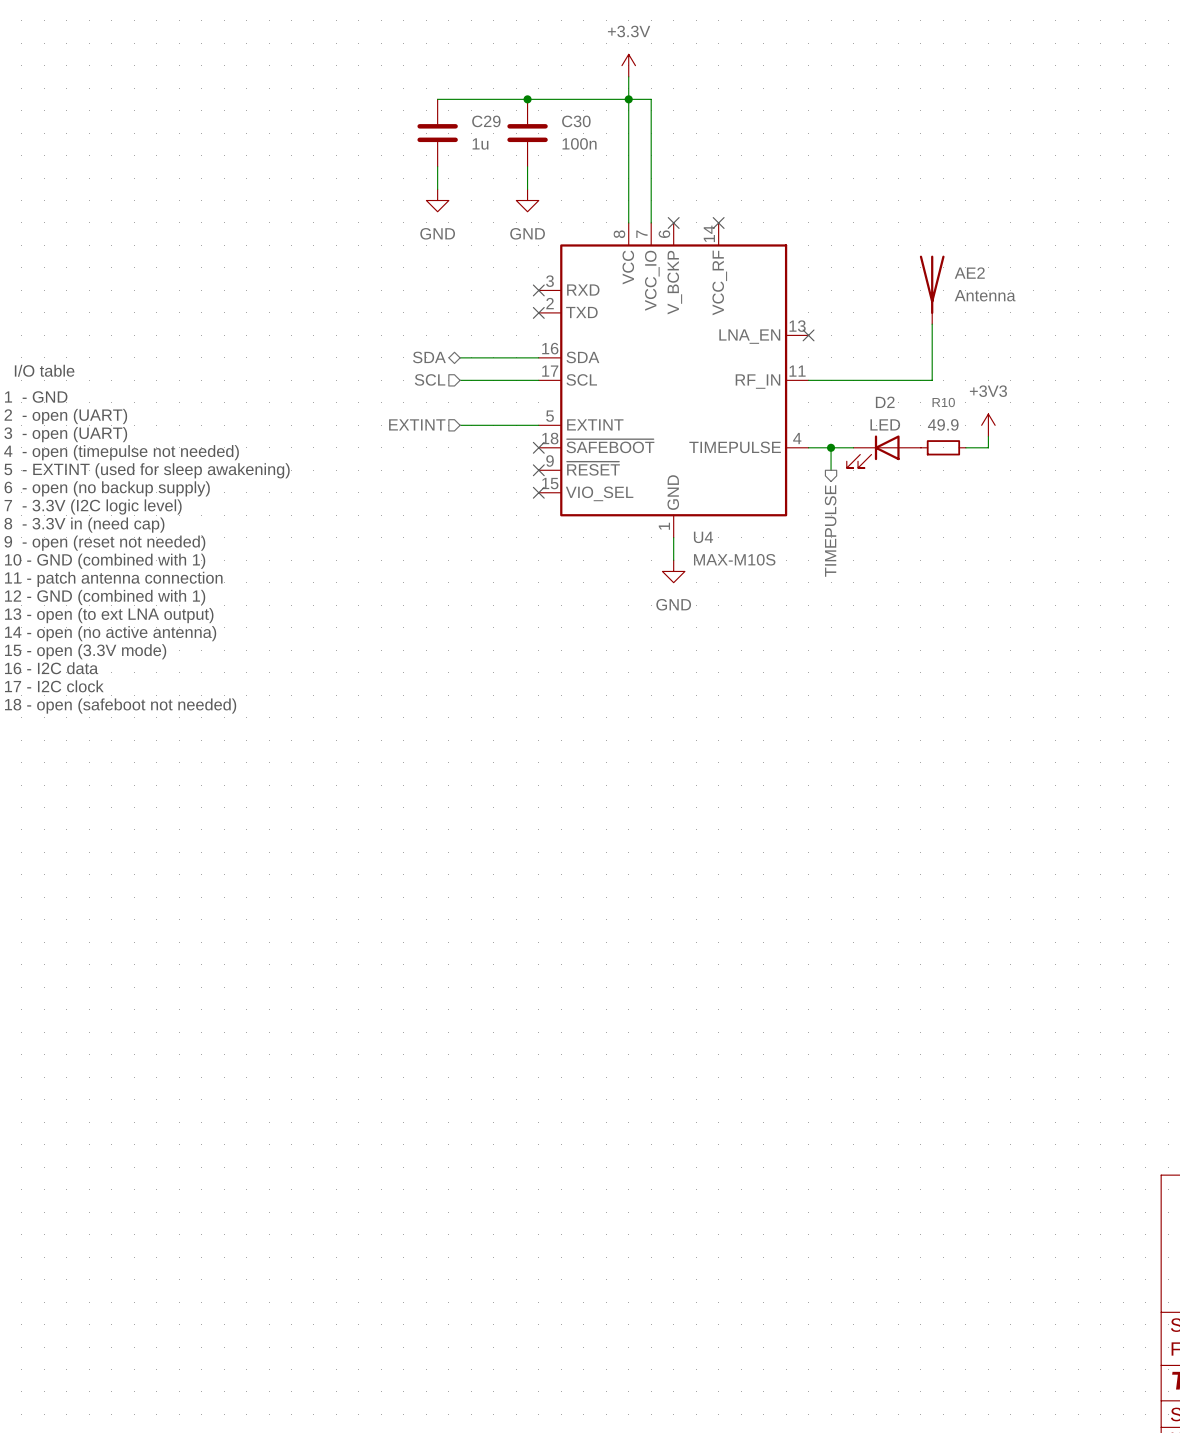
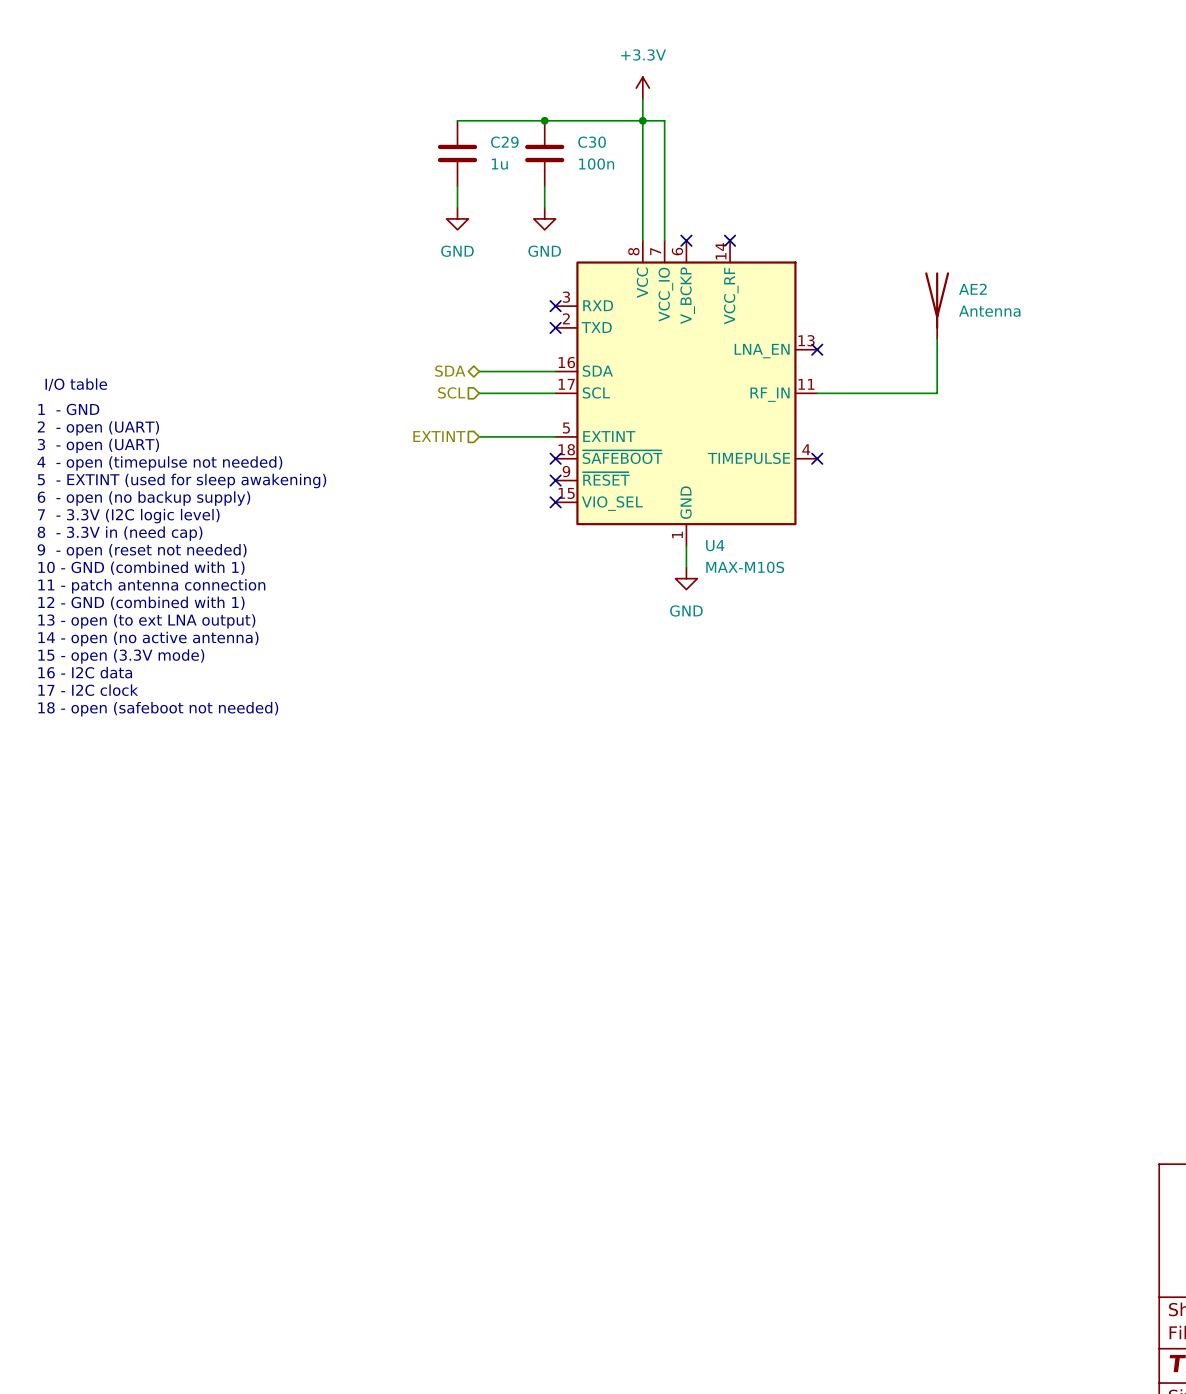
power symbol: +3V3 (988, 425) -> none
wire: (988, 436) (988, 447) (965, 447) -> none
wire: (808, 447) (853, 447) -> none
no-connect mark: none -> (817, 458)
wire: (831, 447) (831, 470) -> none
junction: (831, 447) -> none
R10: 49.9 (943, 447) -> none
D2: LED (883, 451) -> none
hierarchical label: TIMEPULSE (830, 531) -> none

